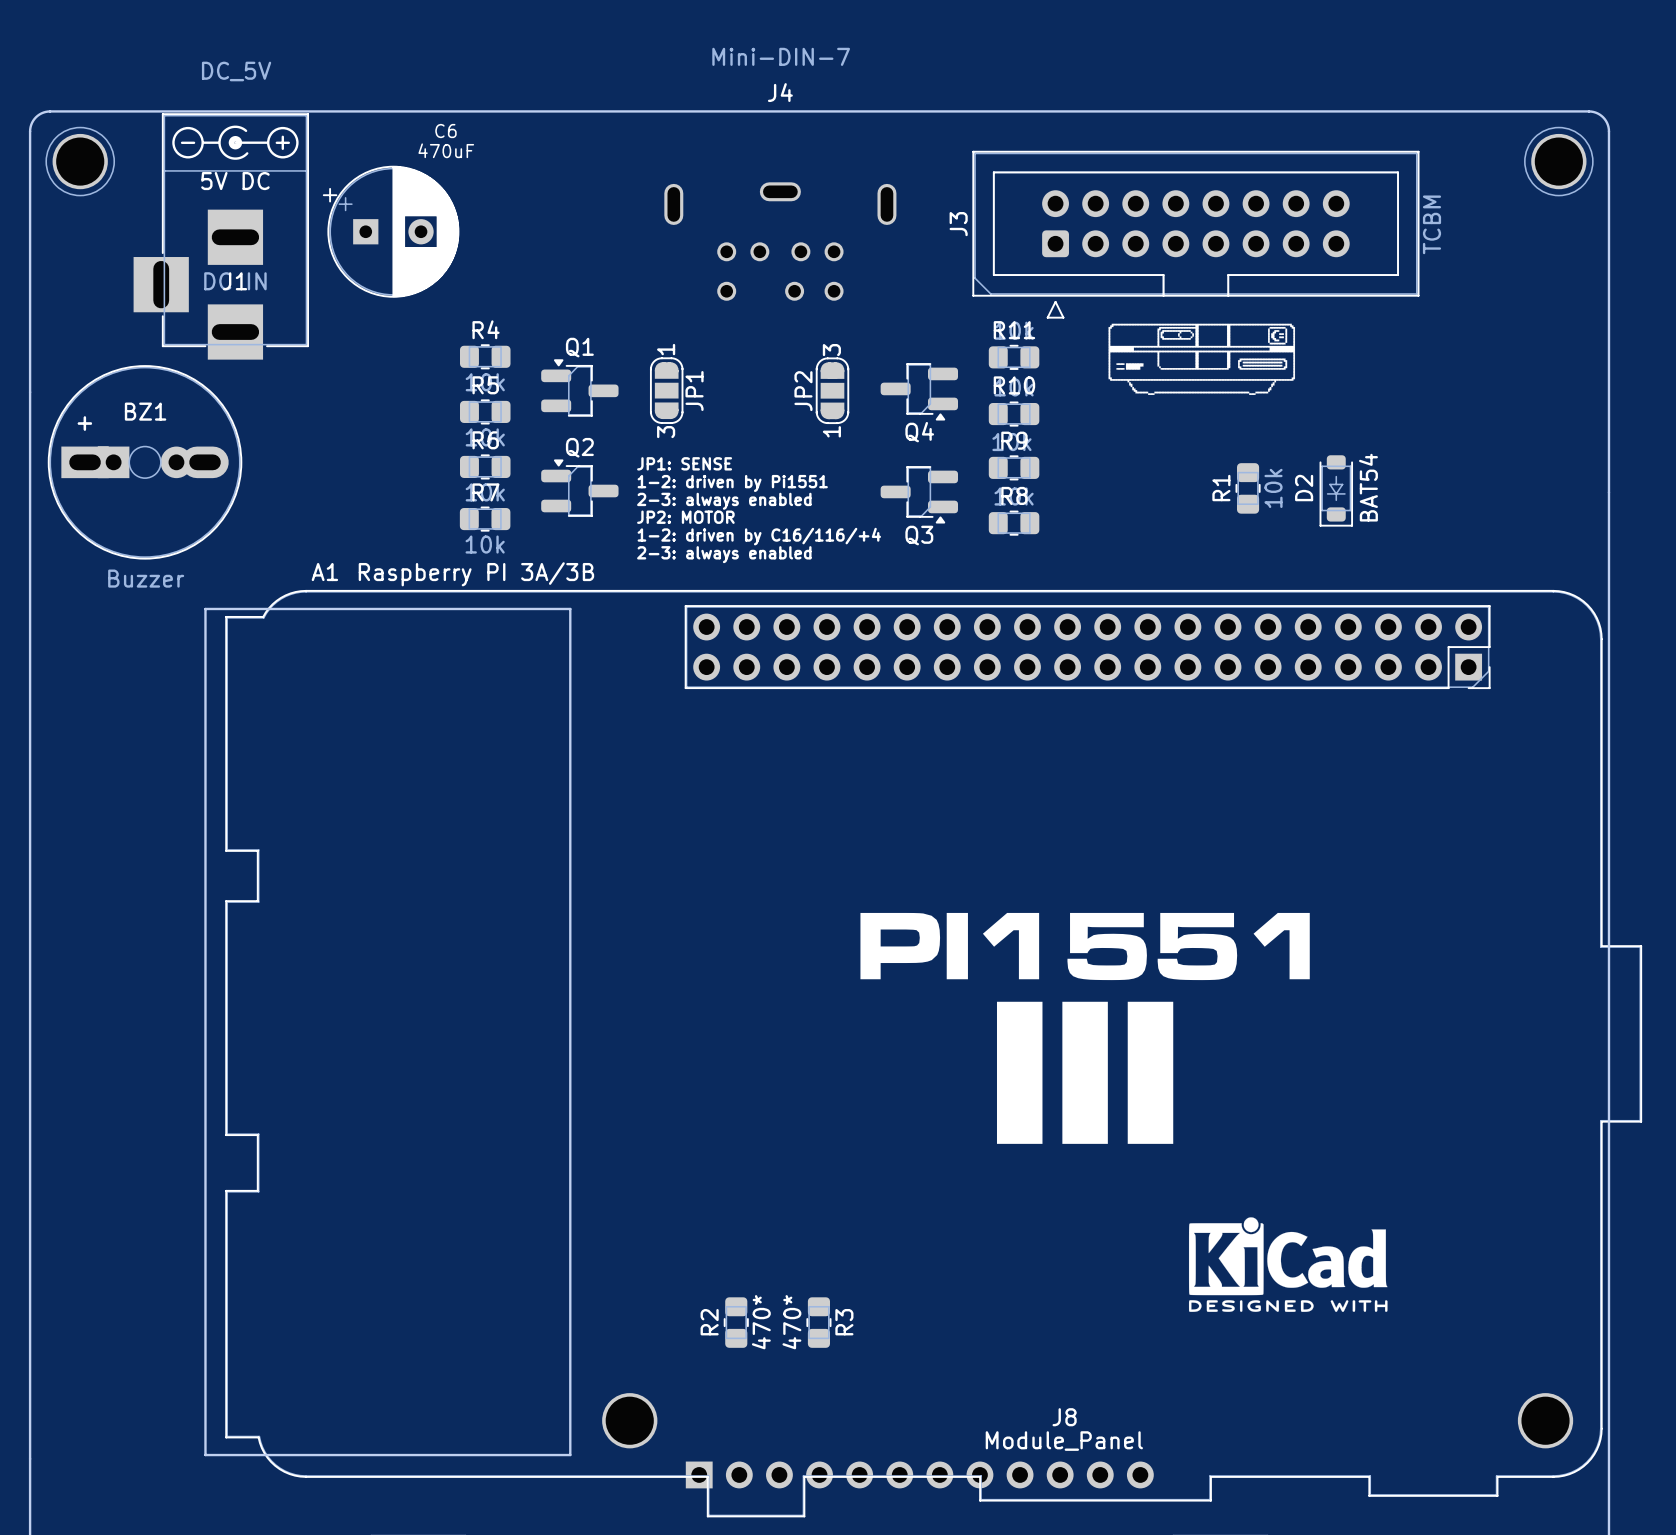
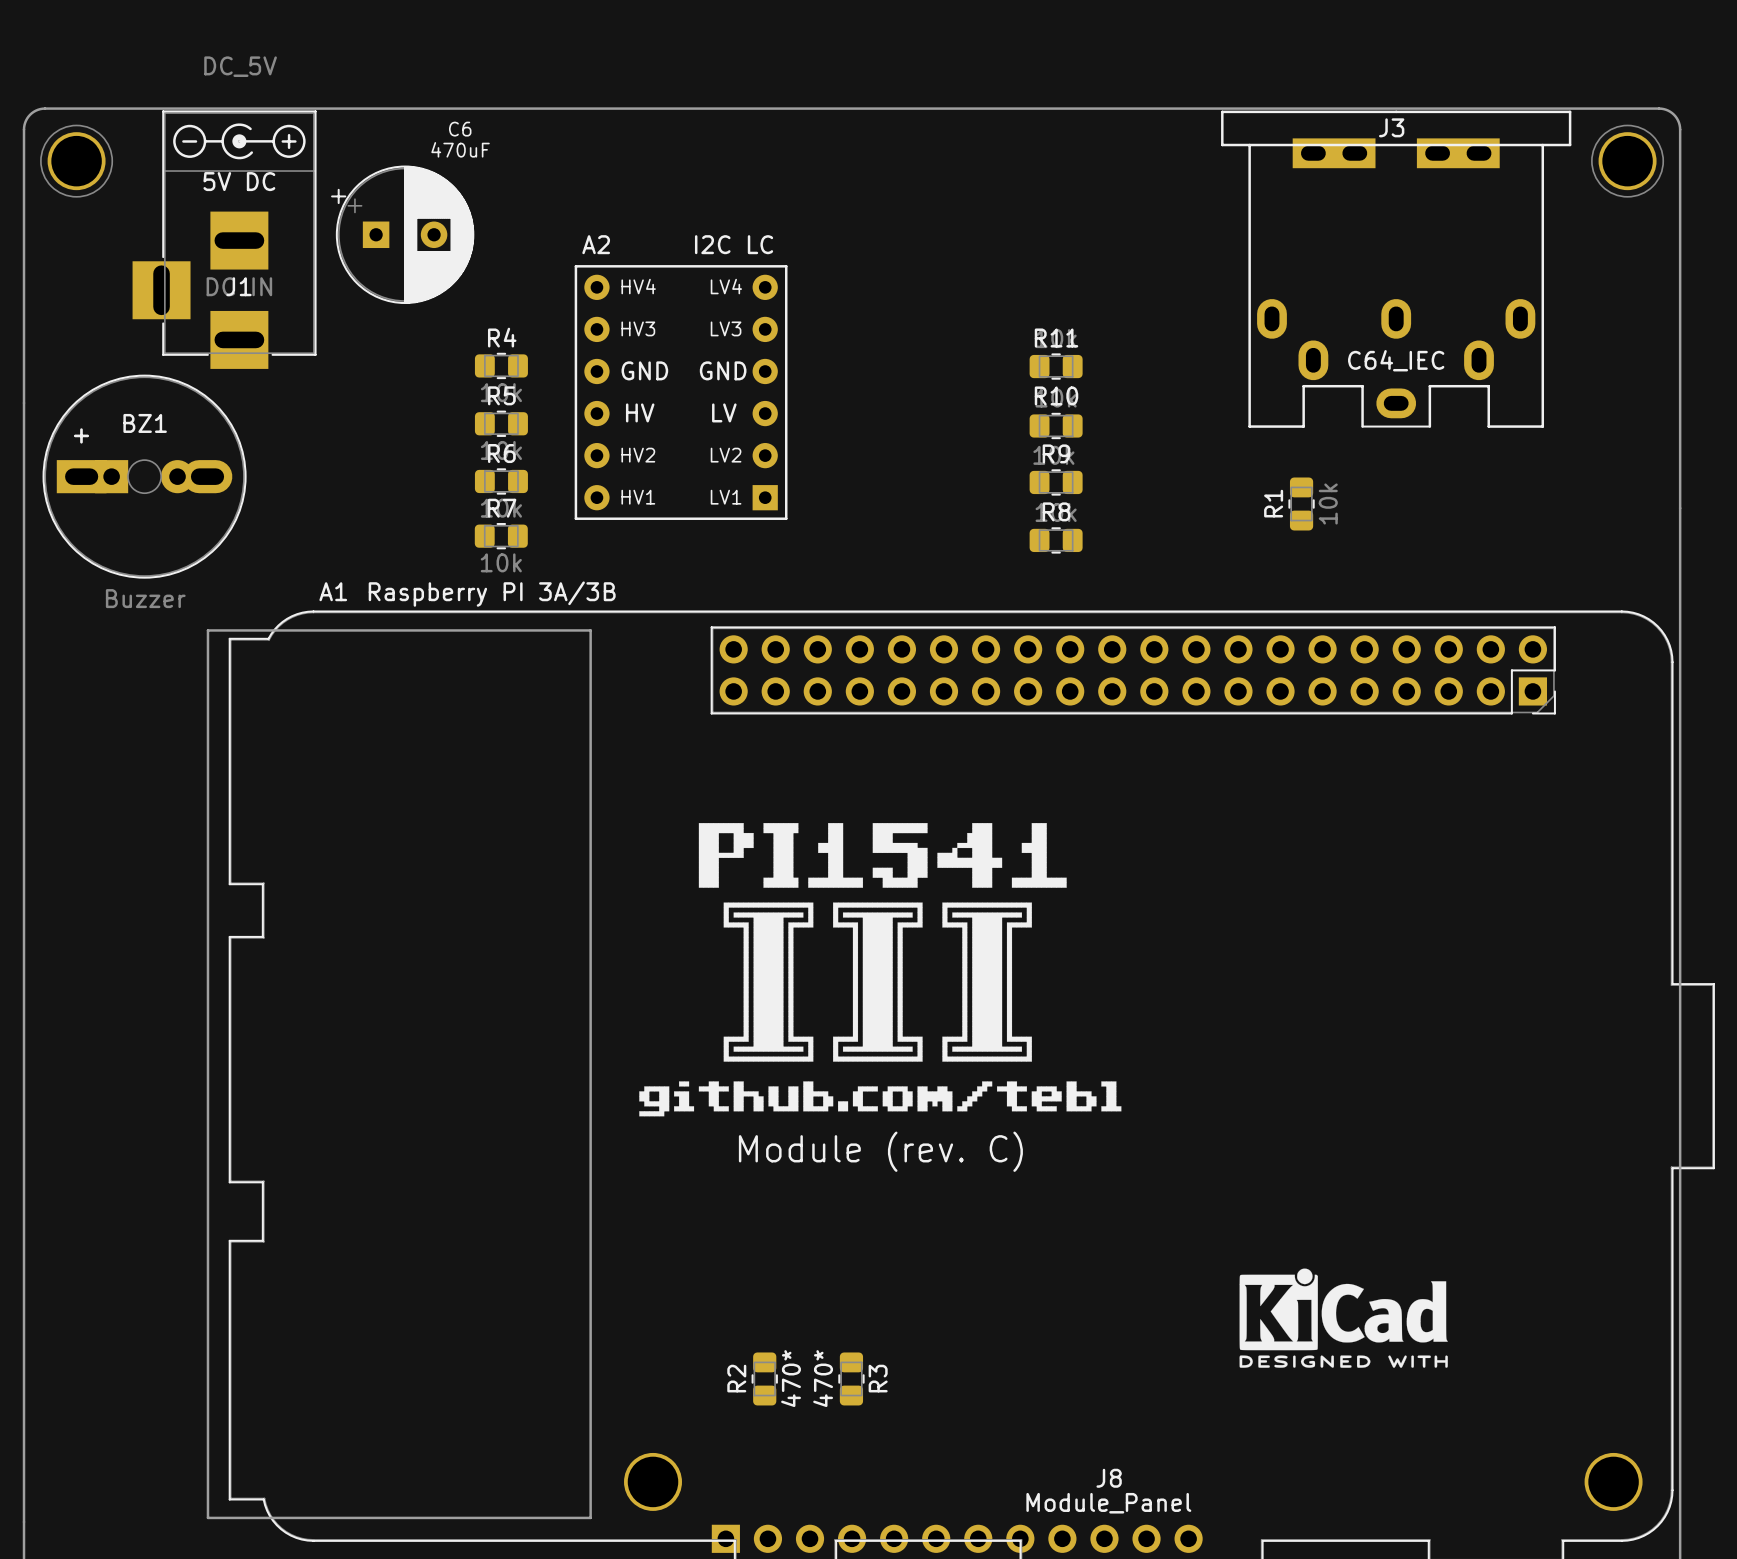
J3 footprint: [972, 150, 1420, 319] -> [1221, 110, 1572, 428]
J3 name position: J3 (958, 224) -> J3 (1391, 127)
J3 value: TCBM (1432, 224) -> C64_IEC (1396, 360)
J4: Mini-DIN-7 (780, 241) -> none
drawing: [1108, 323, 1296, 395] -> none
A2: none -> I2C LC (681, 392)
Q1: (579, 387) -> none
JP1: (666, 390) -> none
JP2: (832, 390) -> none
Q4: (919, 391) -> none
text: JP1: SENSE (684, 463) -> none
text: 1-2: driven by Pi1551 (732, 483) -> none
Q2: (579, 488) -> none
D2: BAT54 (1336, 490) -> none
Q3: (919, 494) -> none
text: 2-3: always enabled (724, 501) -> none
text: JP2: MOTOR (685, 517) -> none
text: 1-2: driven by C16/116/+4 (759, 536) -> none
text: 2-3: always enabled (724, 554) -> none
drawing: none -> [639, 823, 1122, 1117]
drawing: [860, 912, 1310, 981] -> none
drawing: [996, 1001, 1174, 1144] -> none
text: none -> Module (rev. C) (880, 1151)

